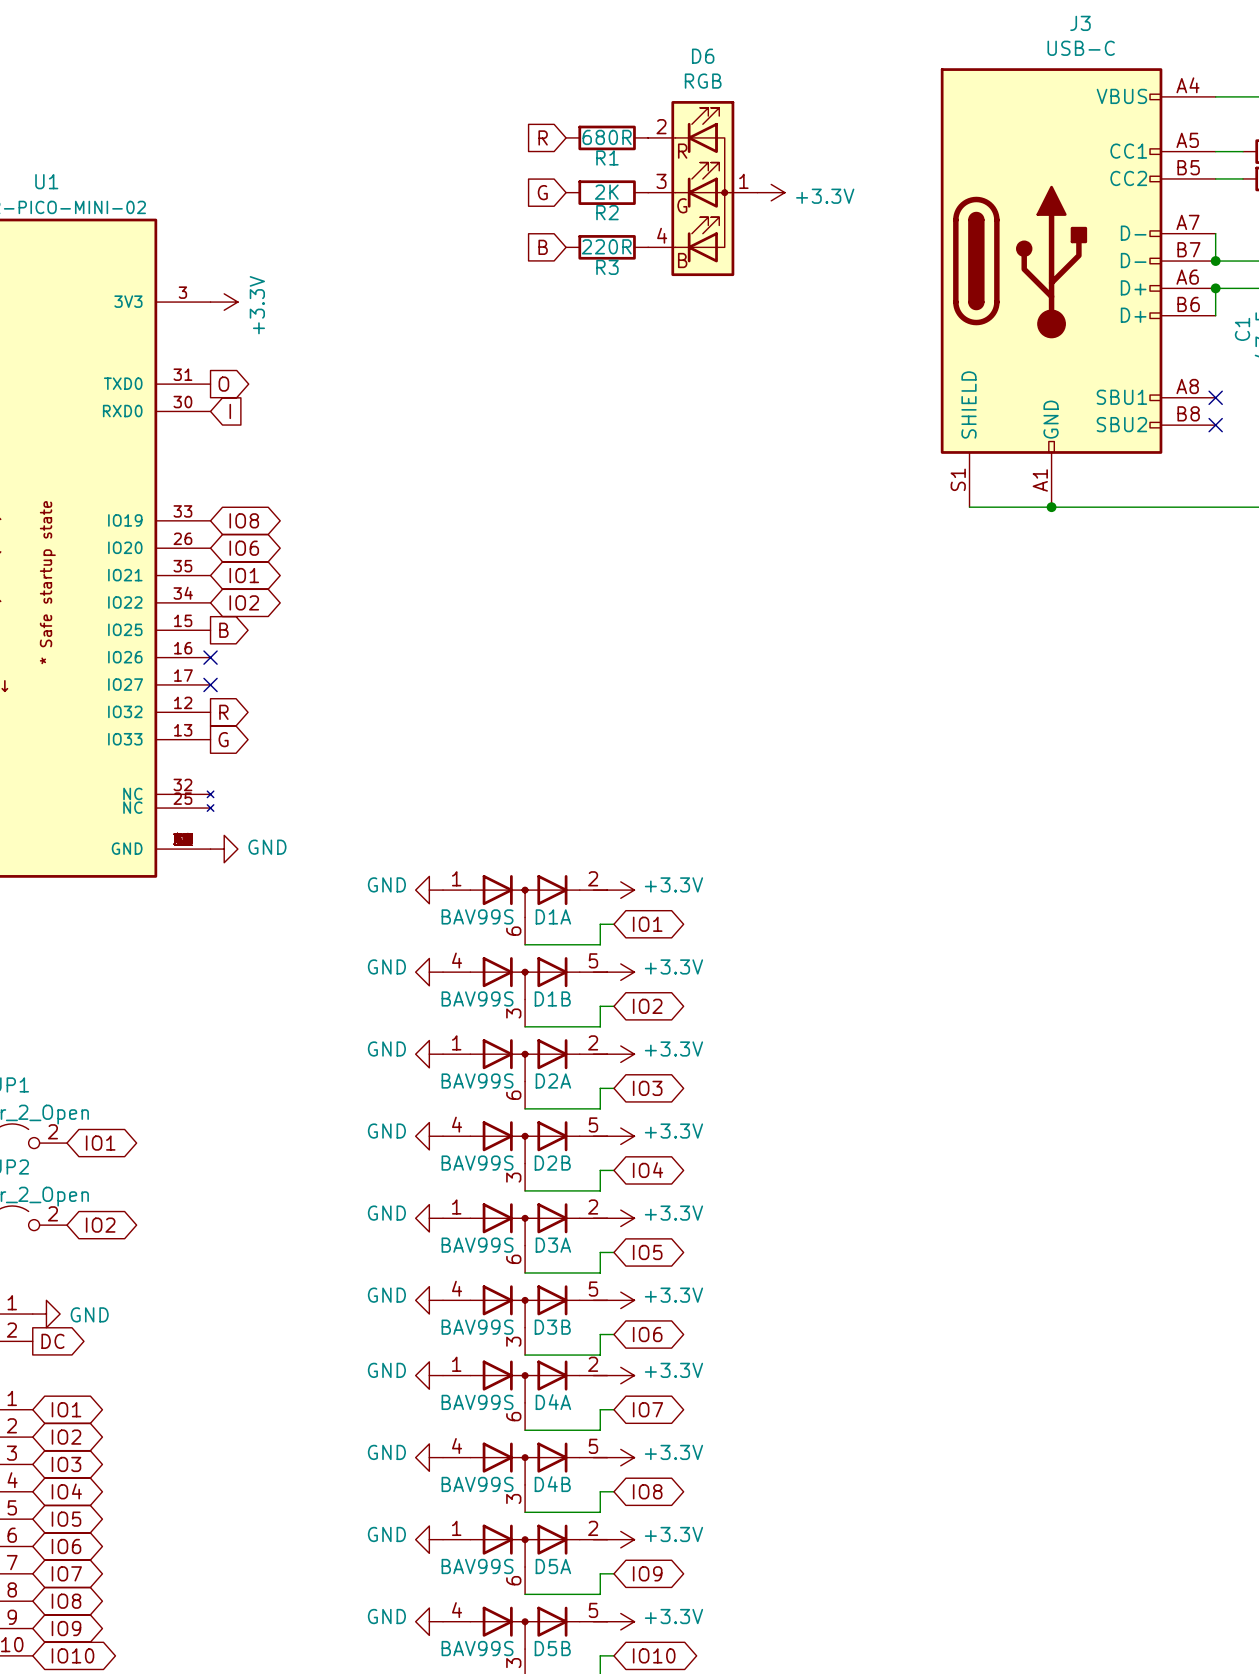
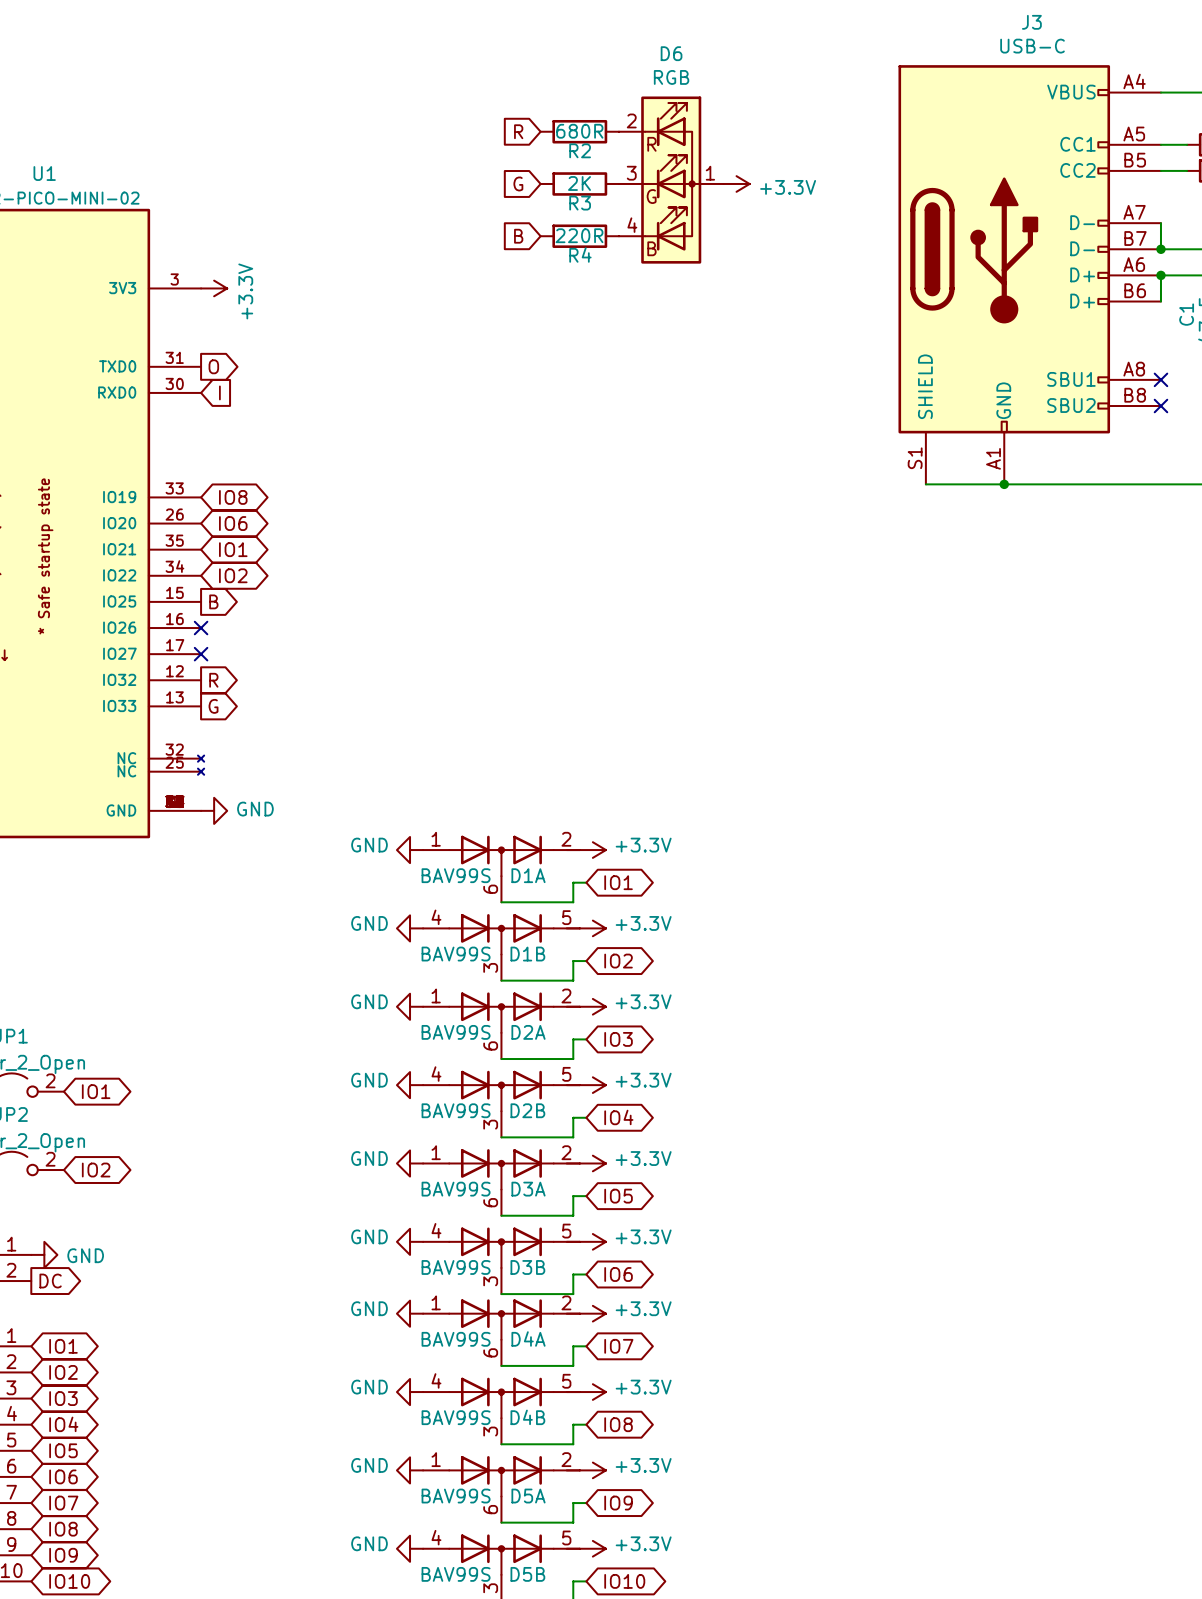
R1 name: R1 (607, 157) -> R2 (580, 150)
R2 name: R2 (607, 212) -> R3 (580, 203)
R3 name: R3 (607, 267) -> R4 (580, 255)

